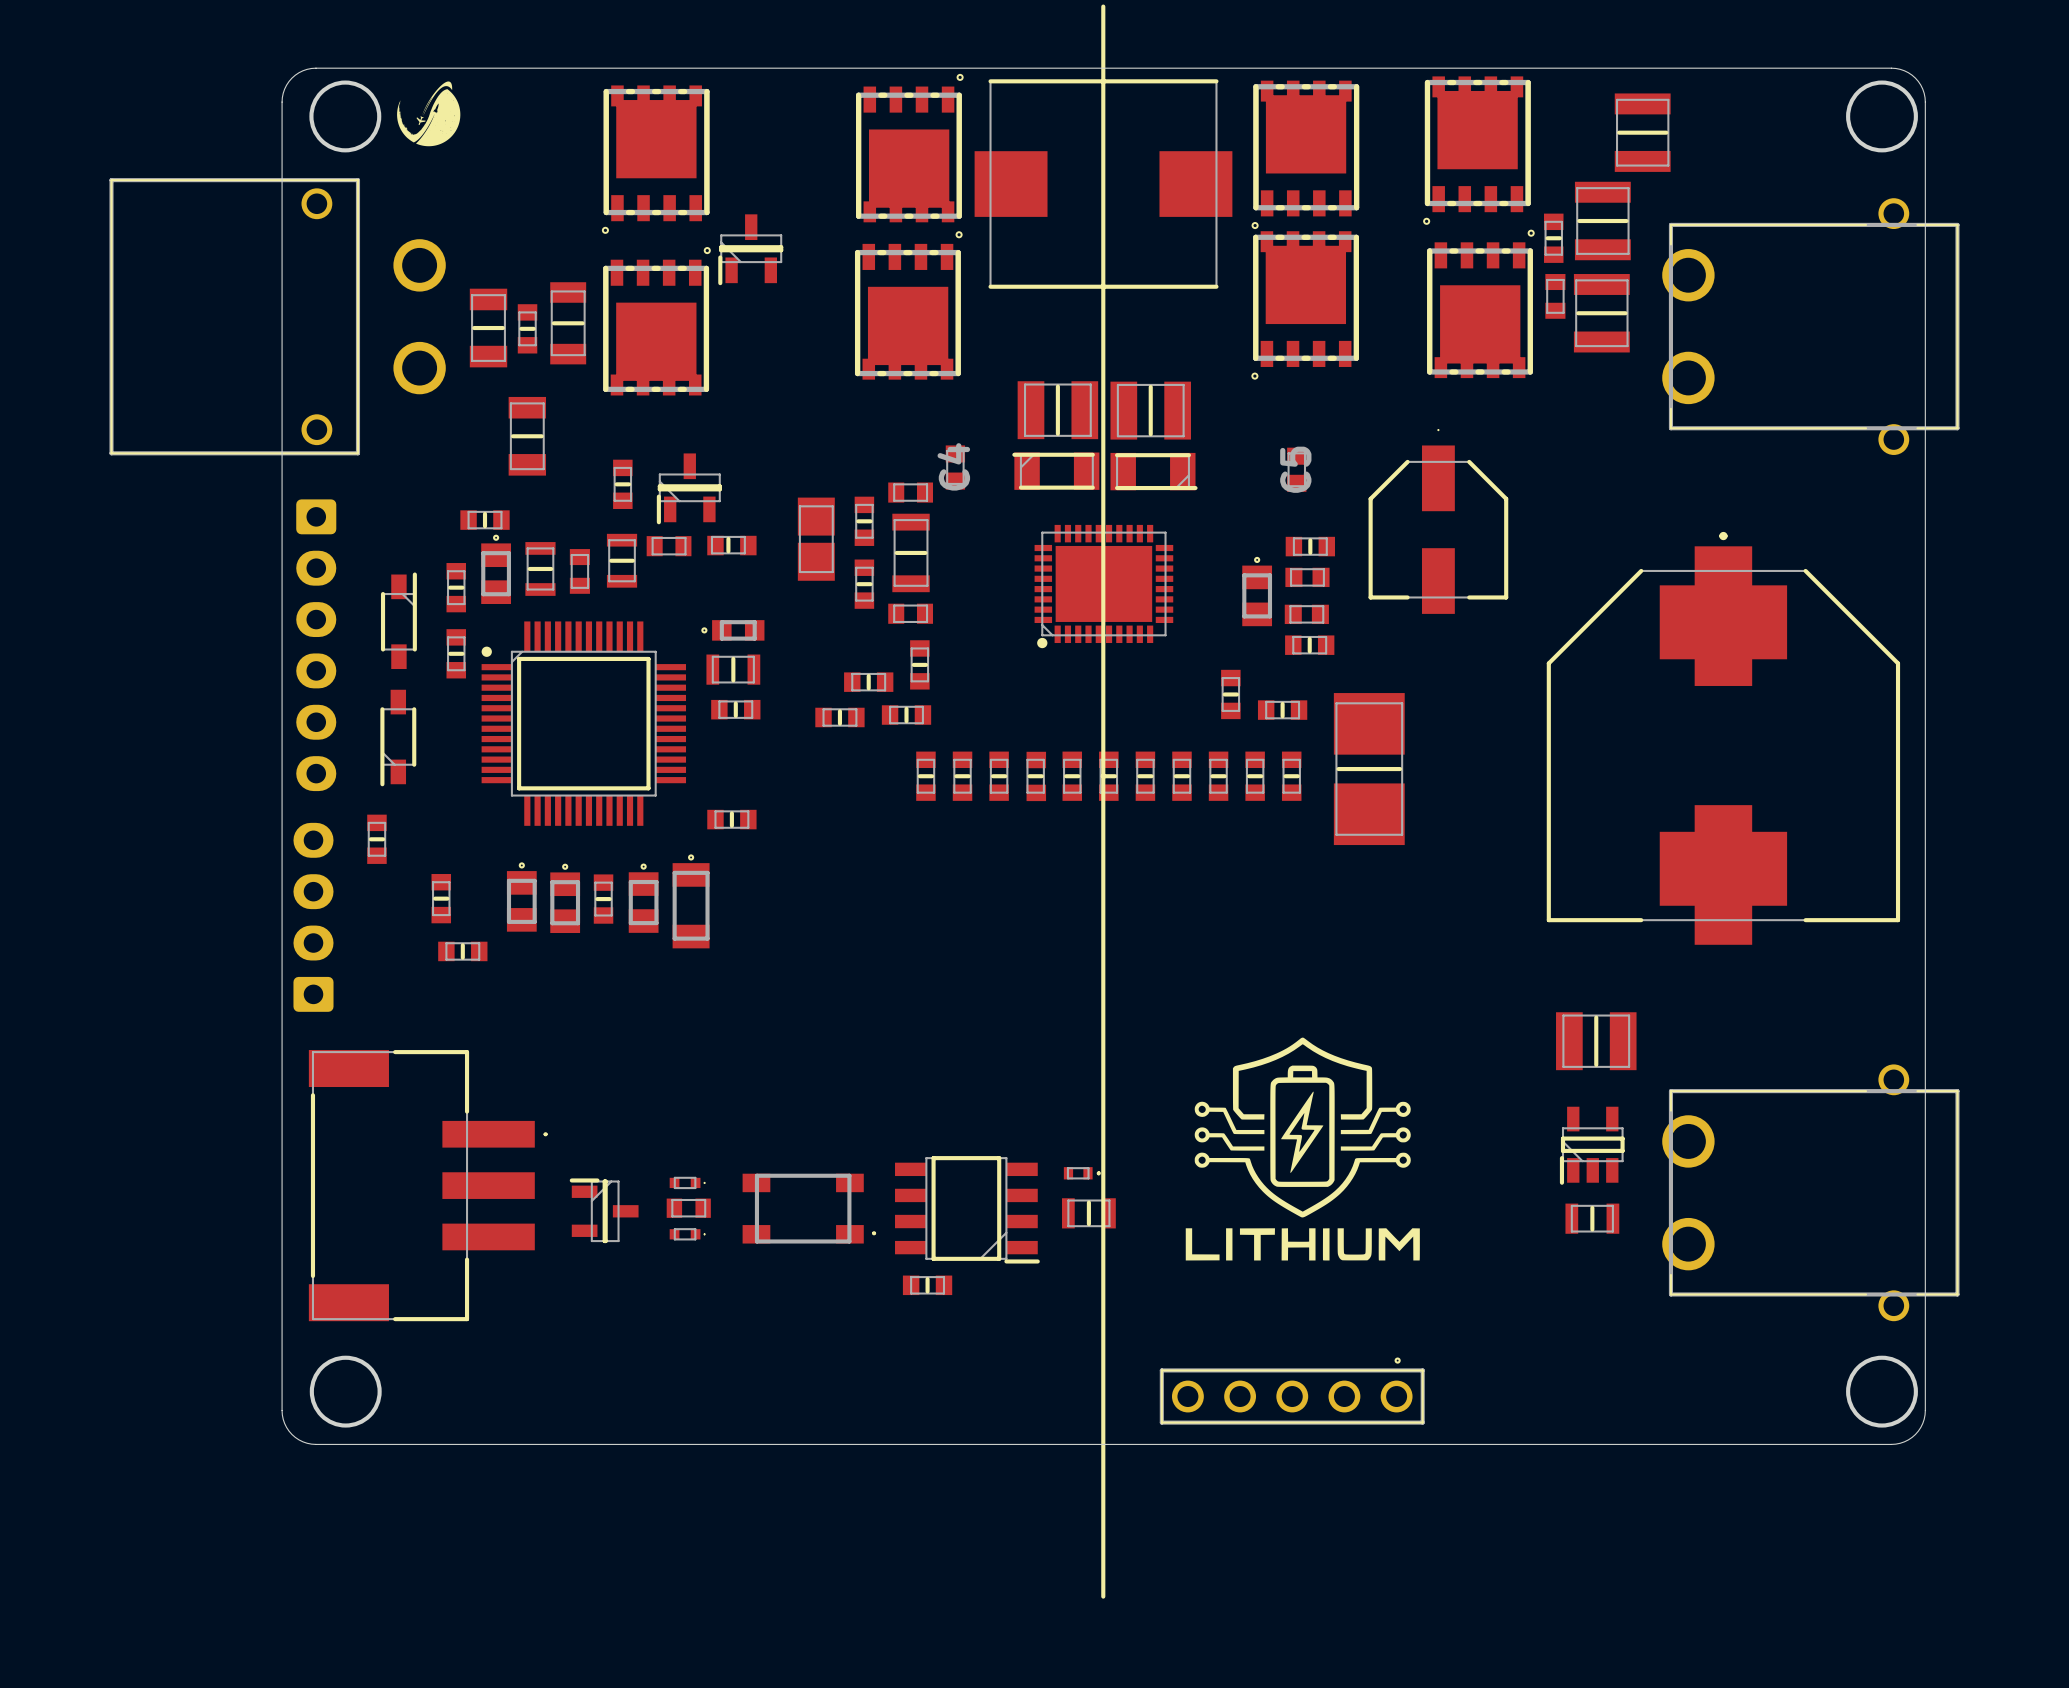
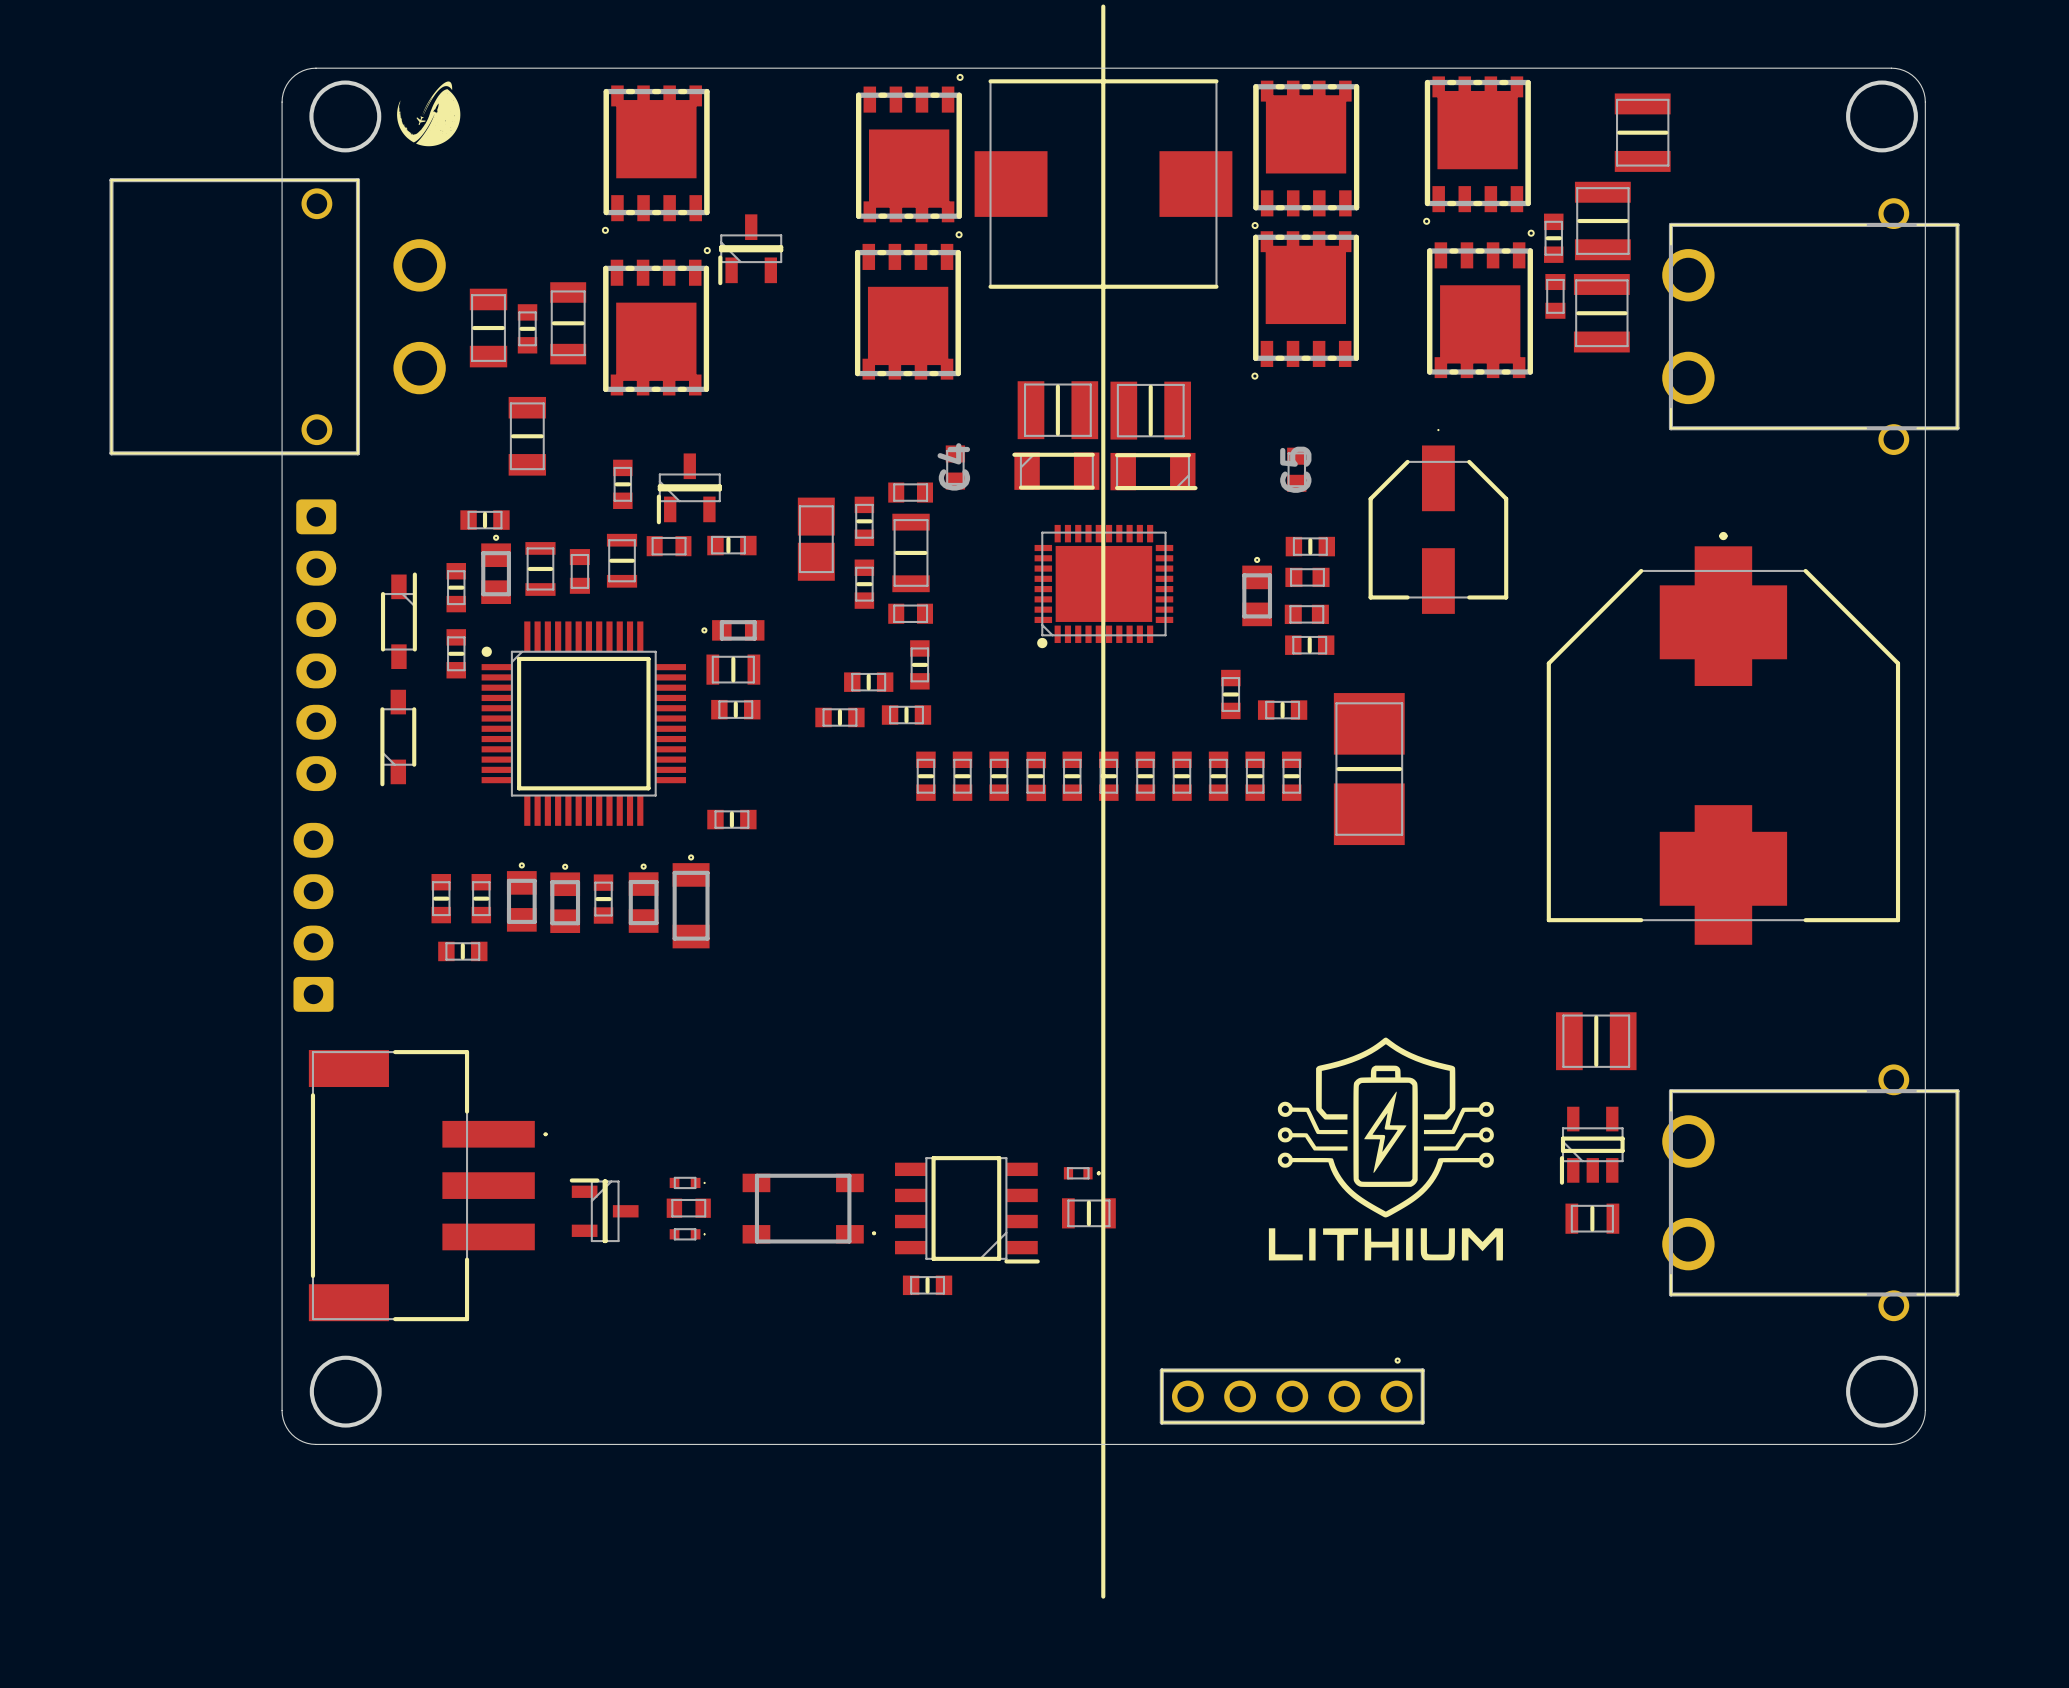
part position: (376, 839) -> (481, 898)
drawing position: (1302, 1149) -> (1385, 1149)

